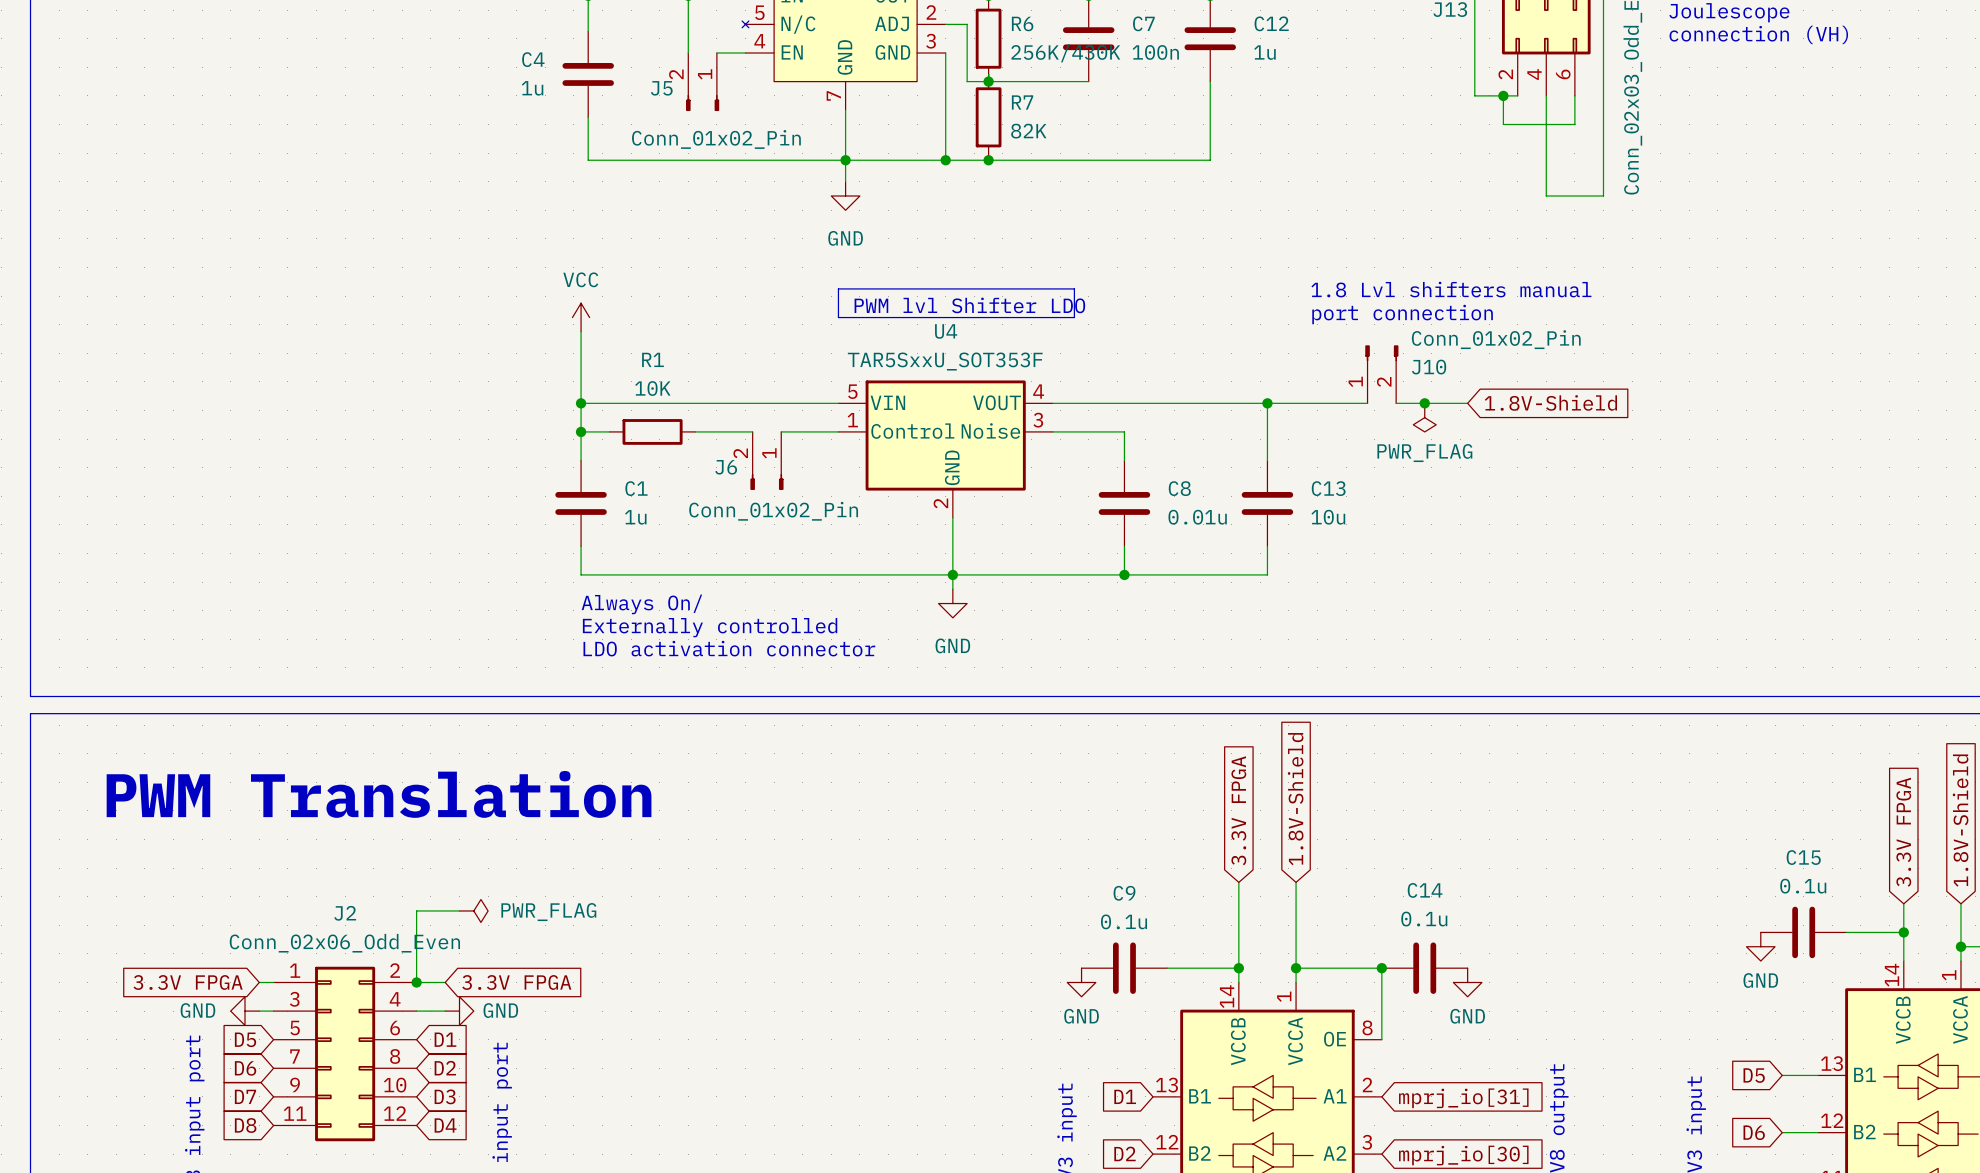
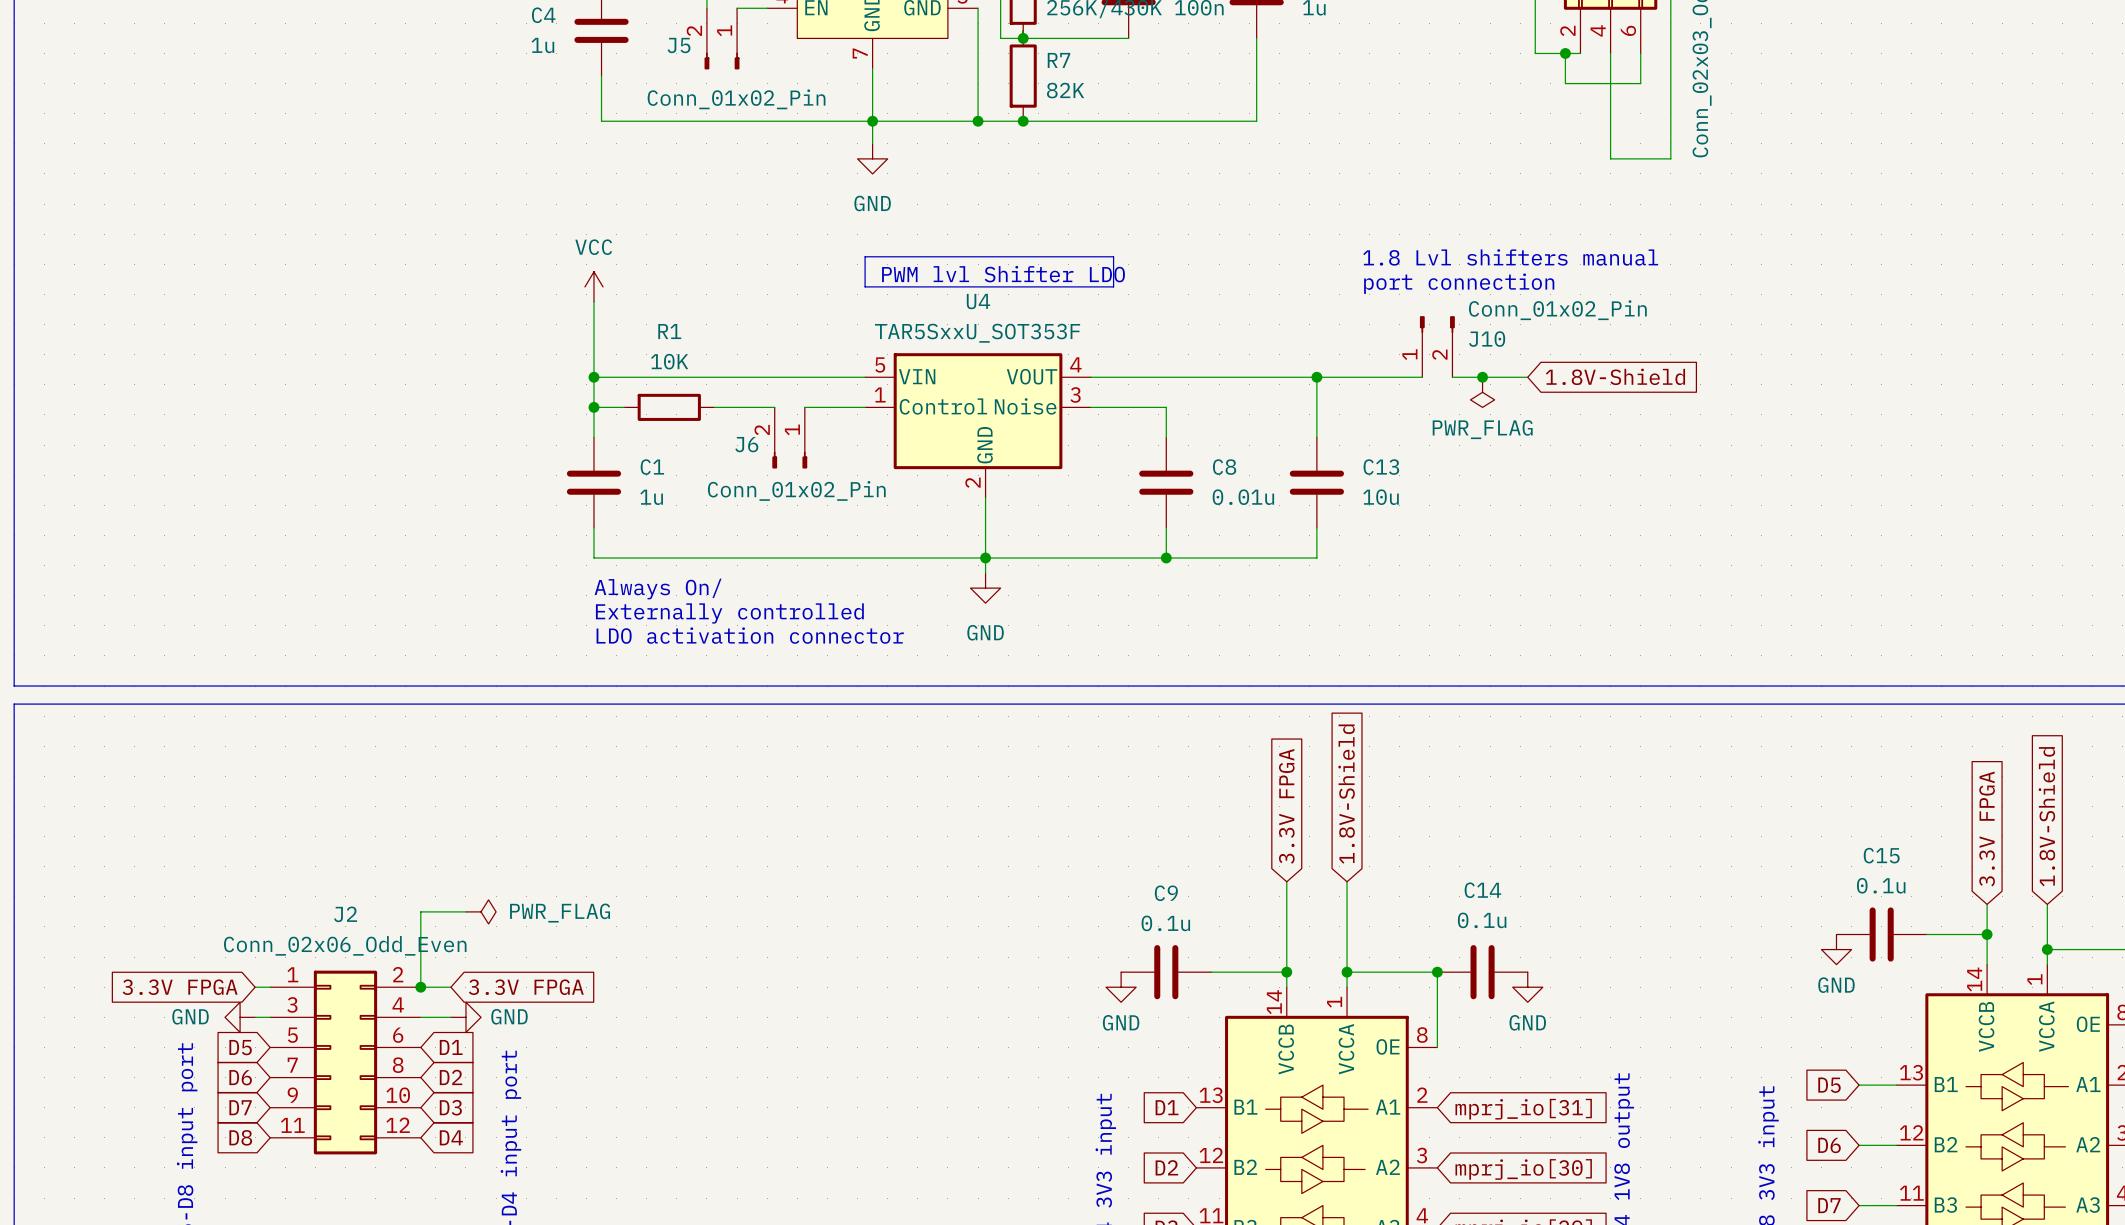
text: PWM Translation (379, 794) -> none

